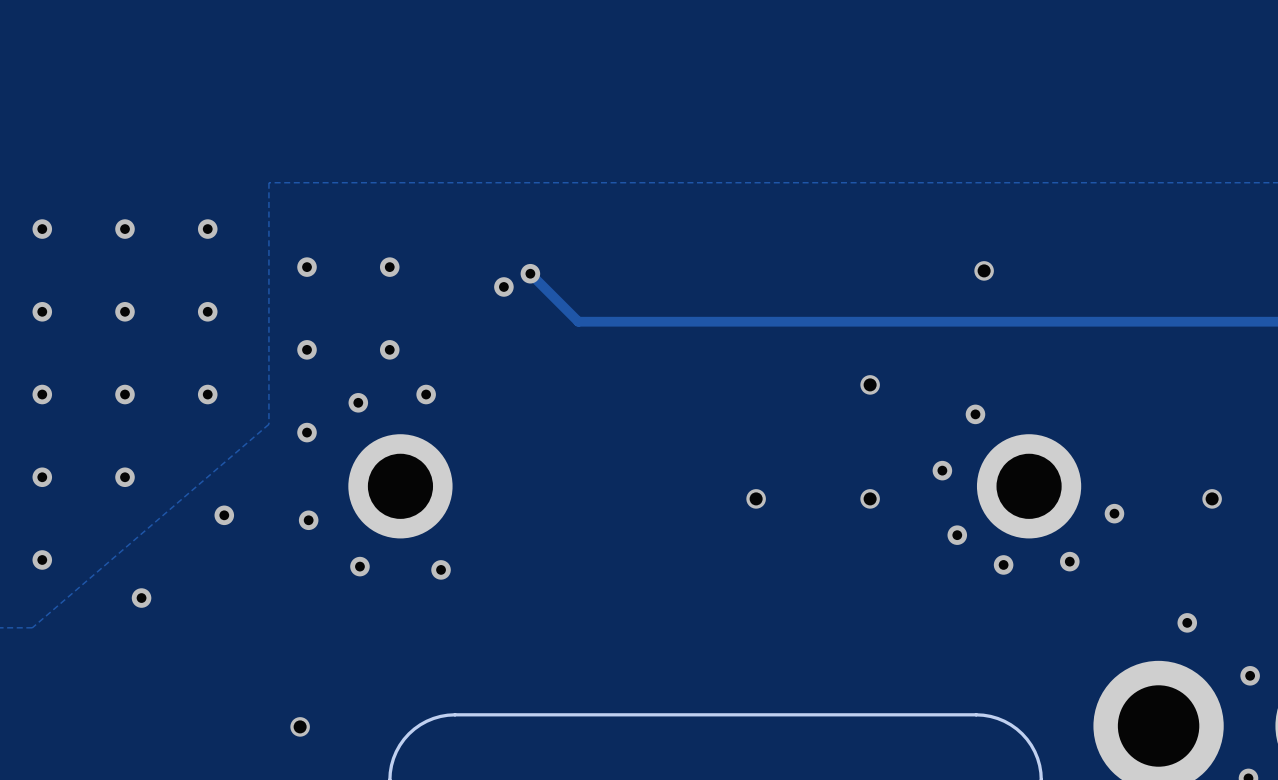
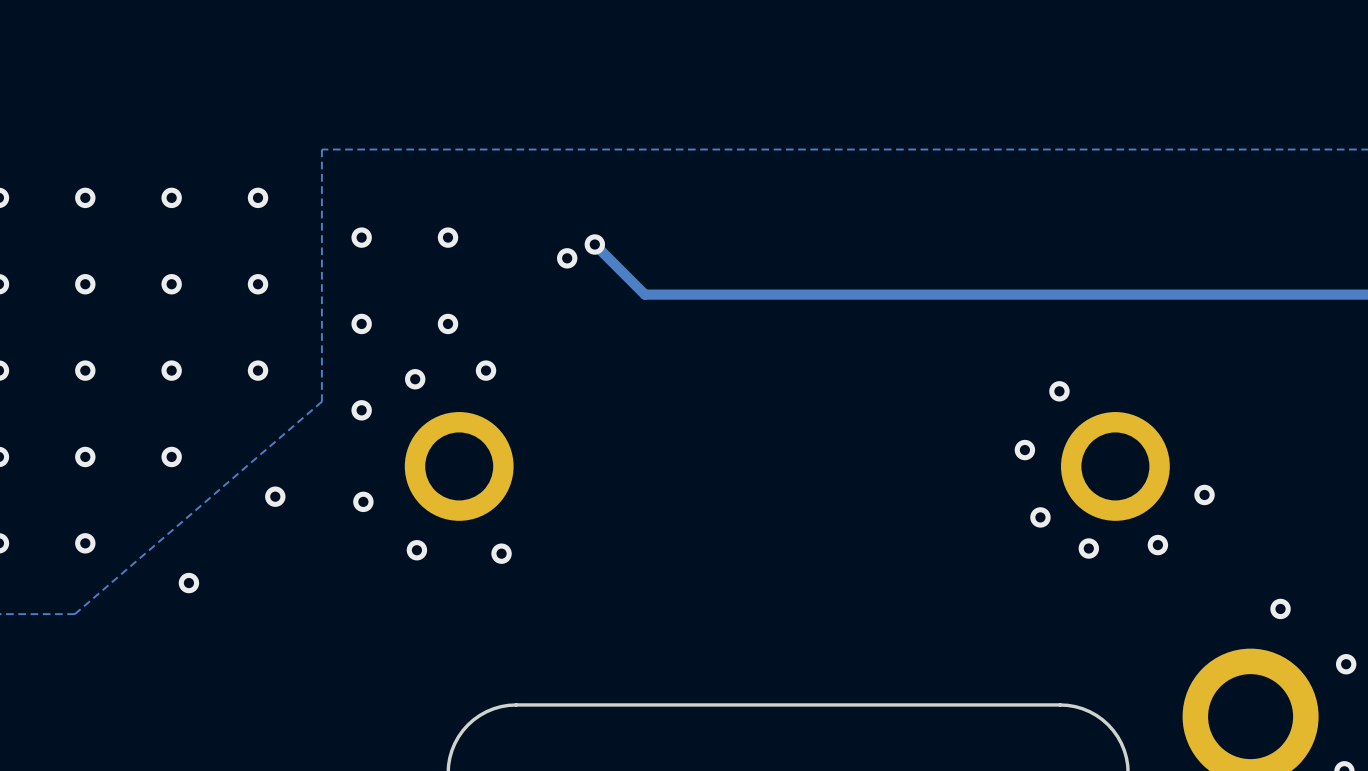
via: (984, 270) -> none
via: (870, 384) -> none
via: (756, 498) -> none
via: (870, 498) -> none
via: (1212, 498) -> none
via: (300, 726) -> none

